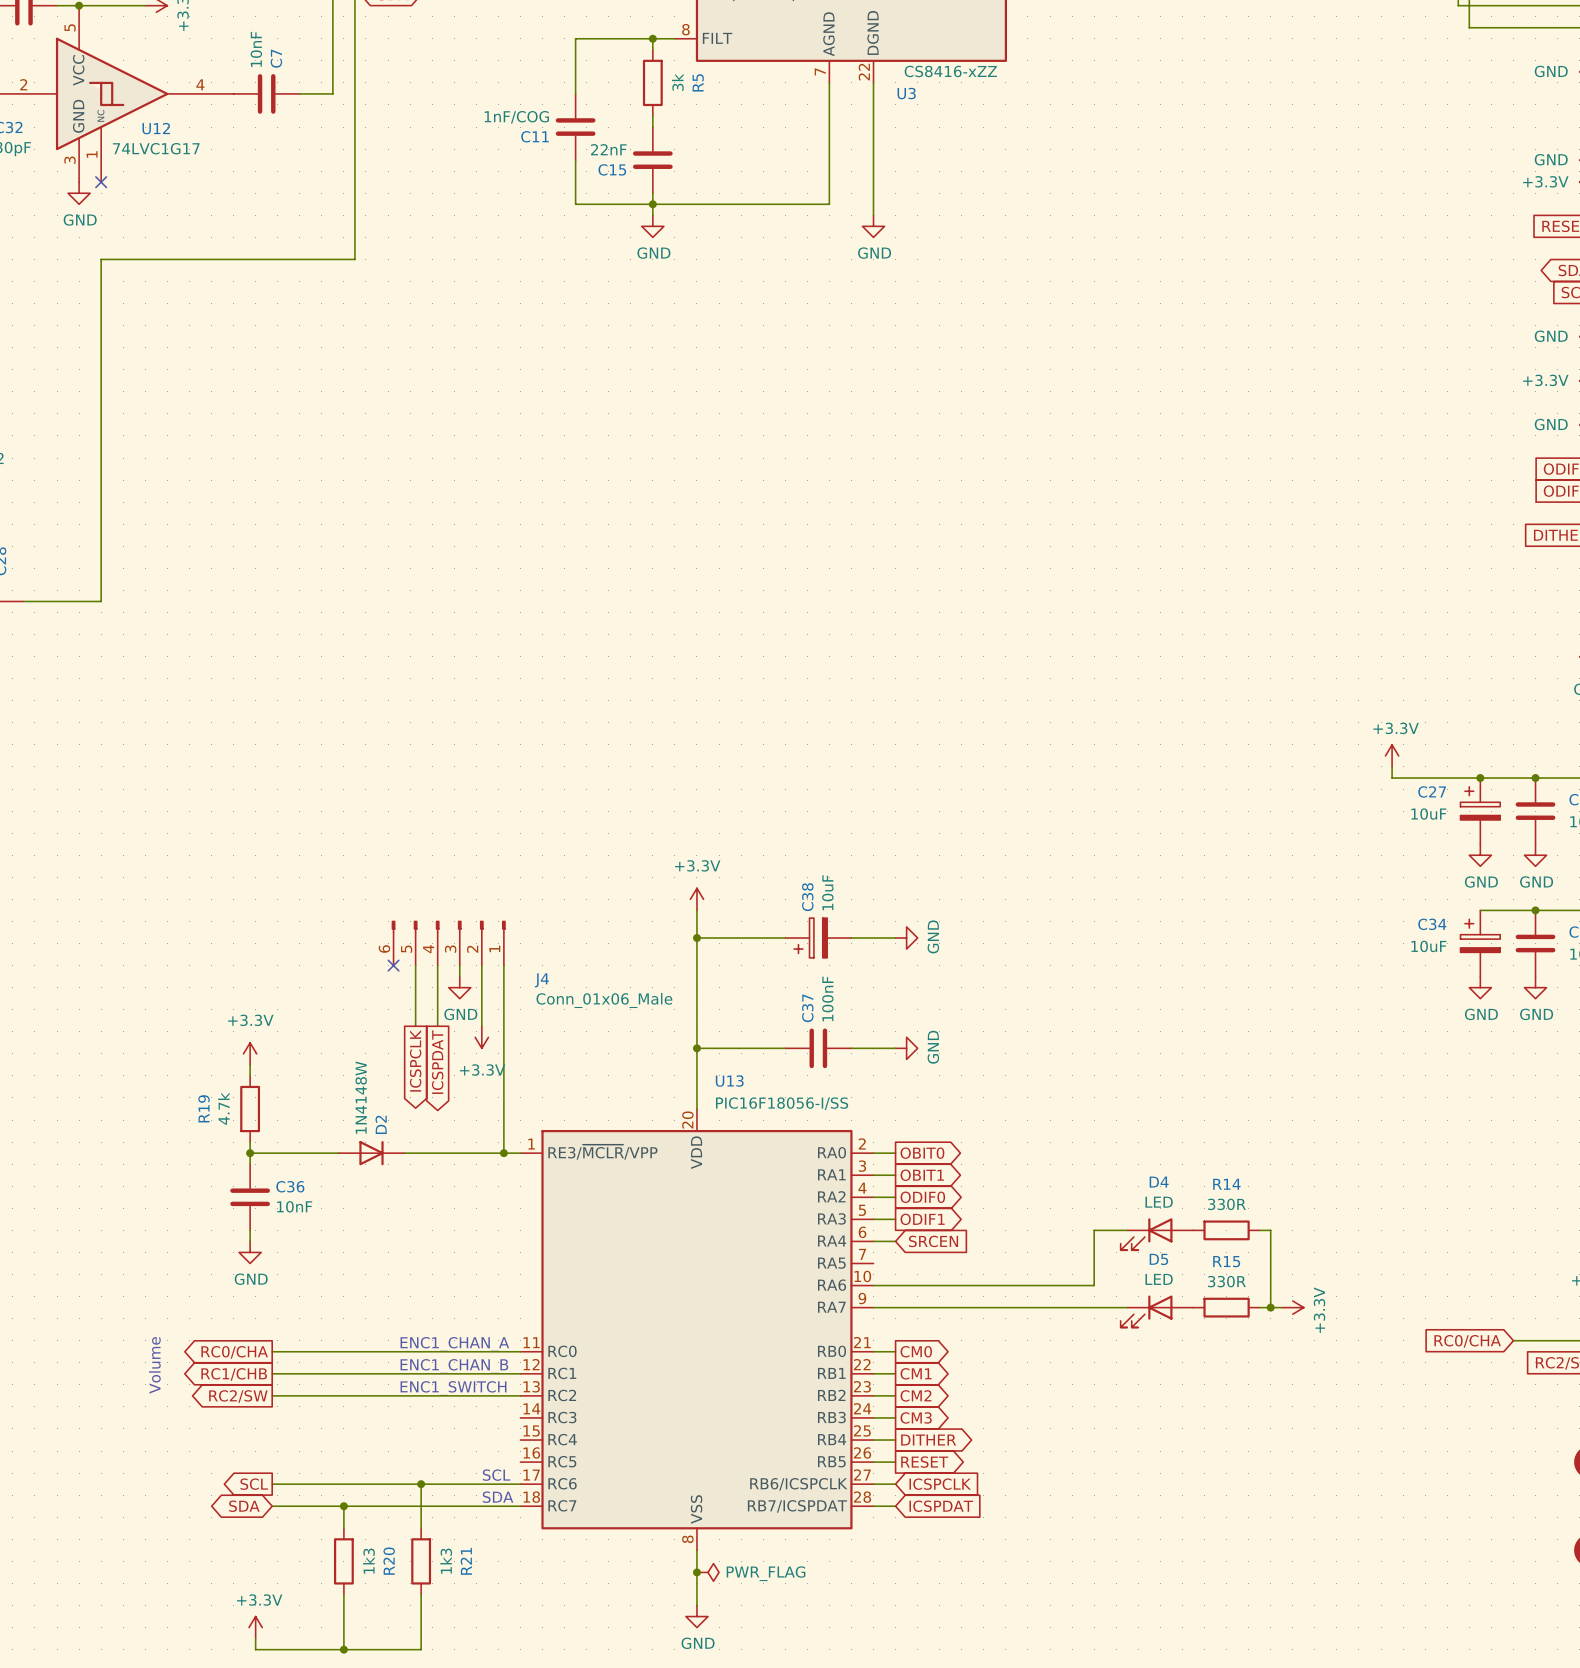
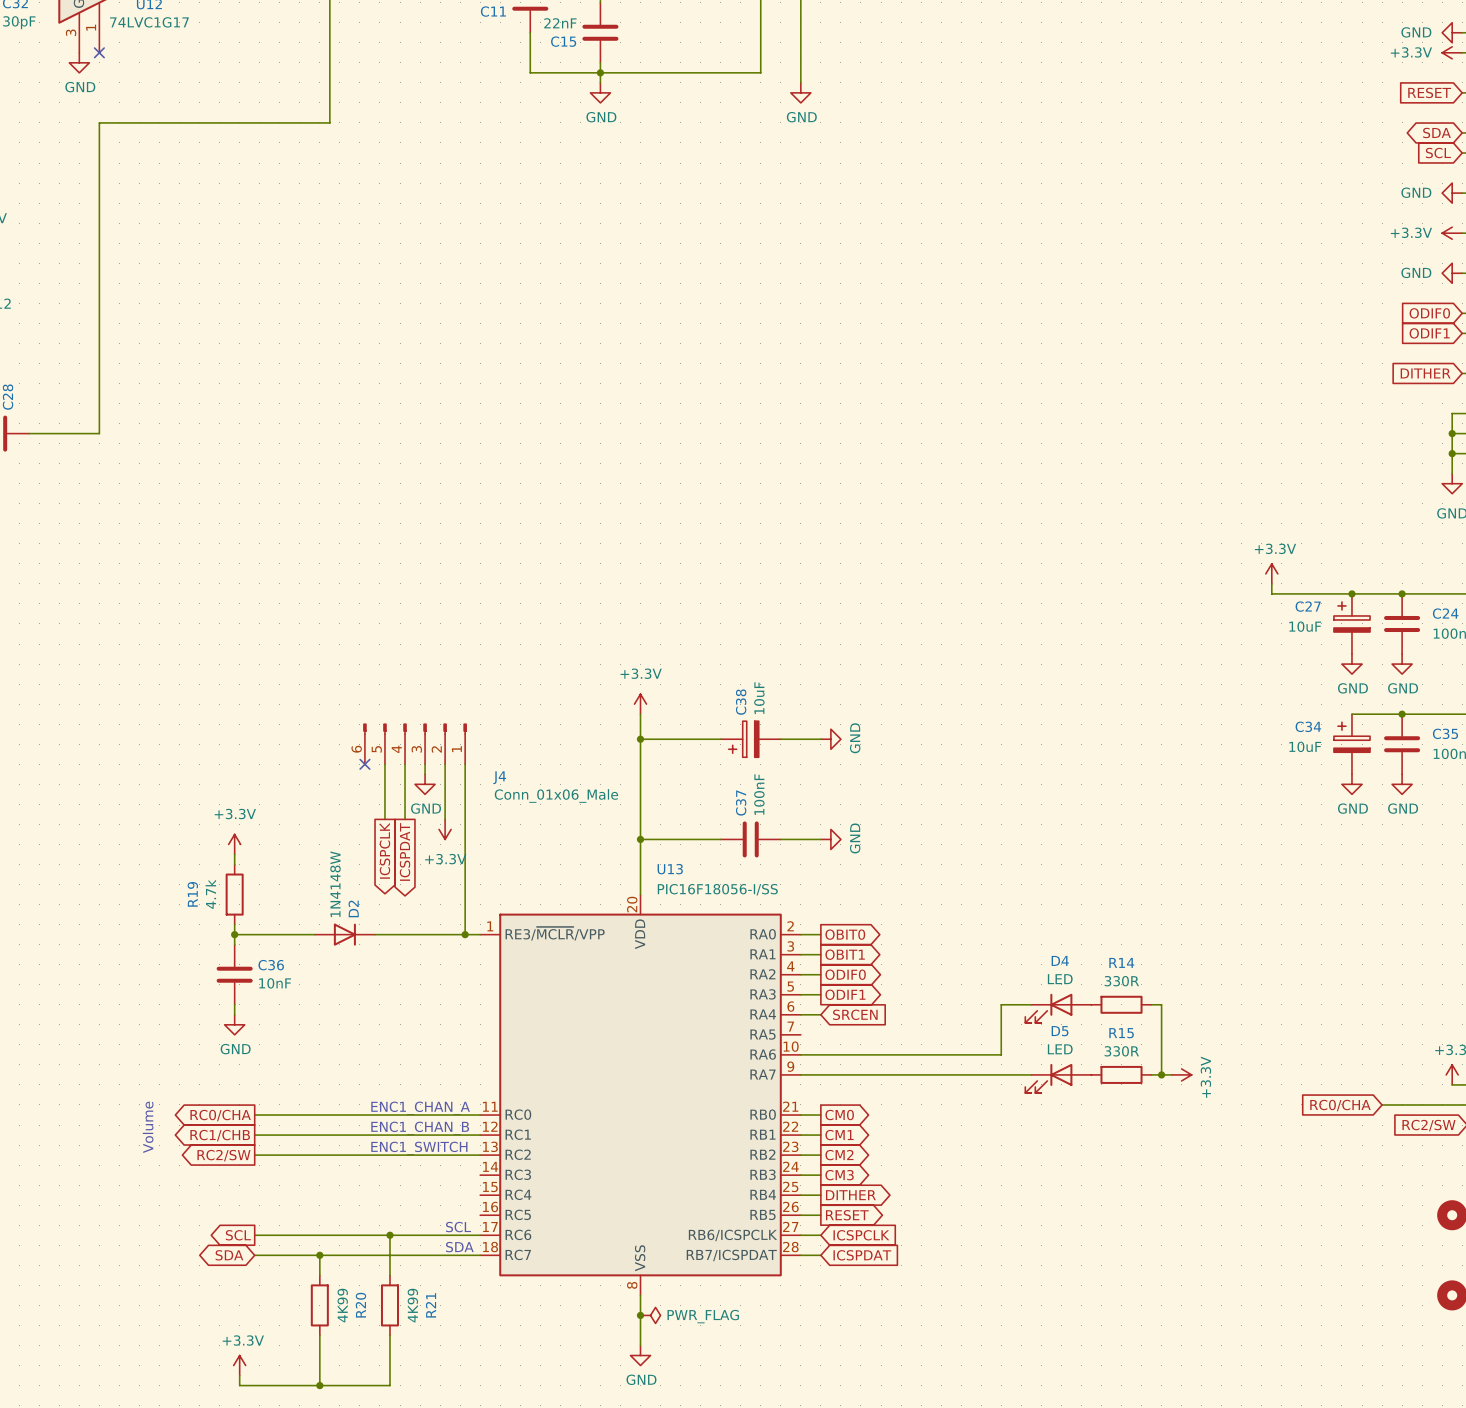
R20 value: 1k3 (368, 1561) -> 4K99 (342, 1305)
R21 value: 1k3 (446, 1561) -> 4K99 (412, 1305)

